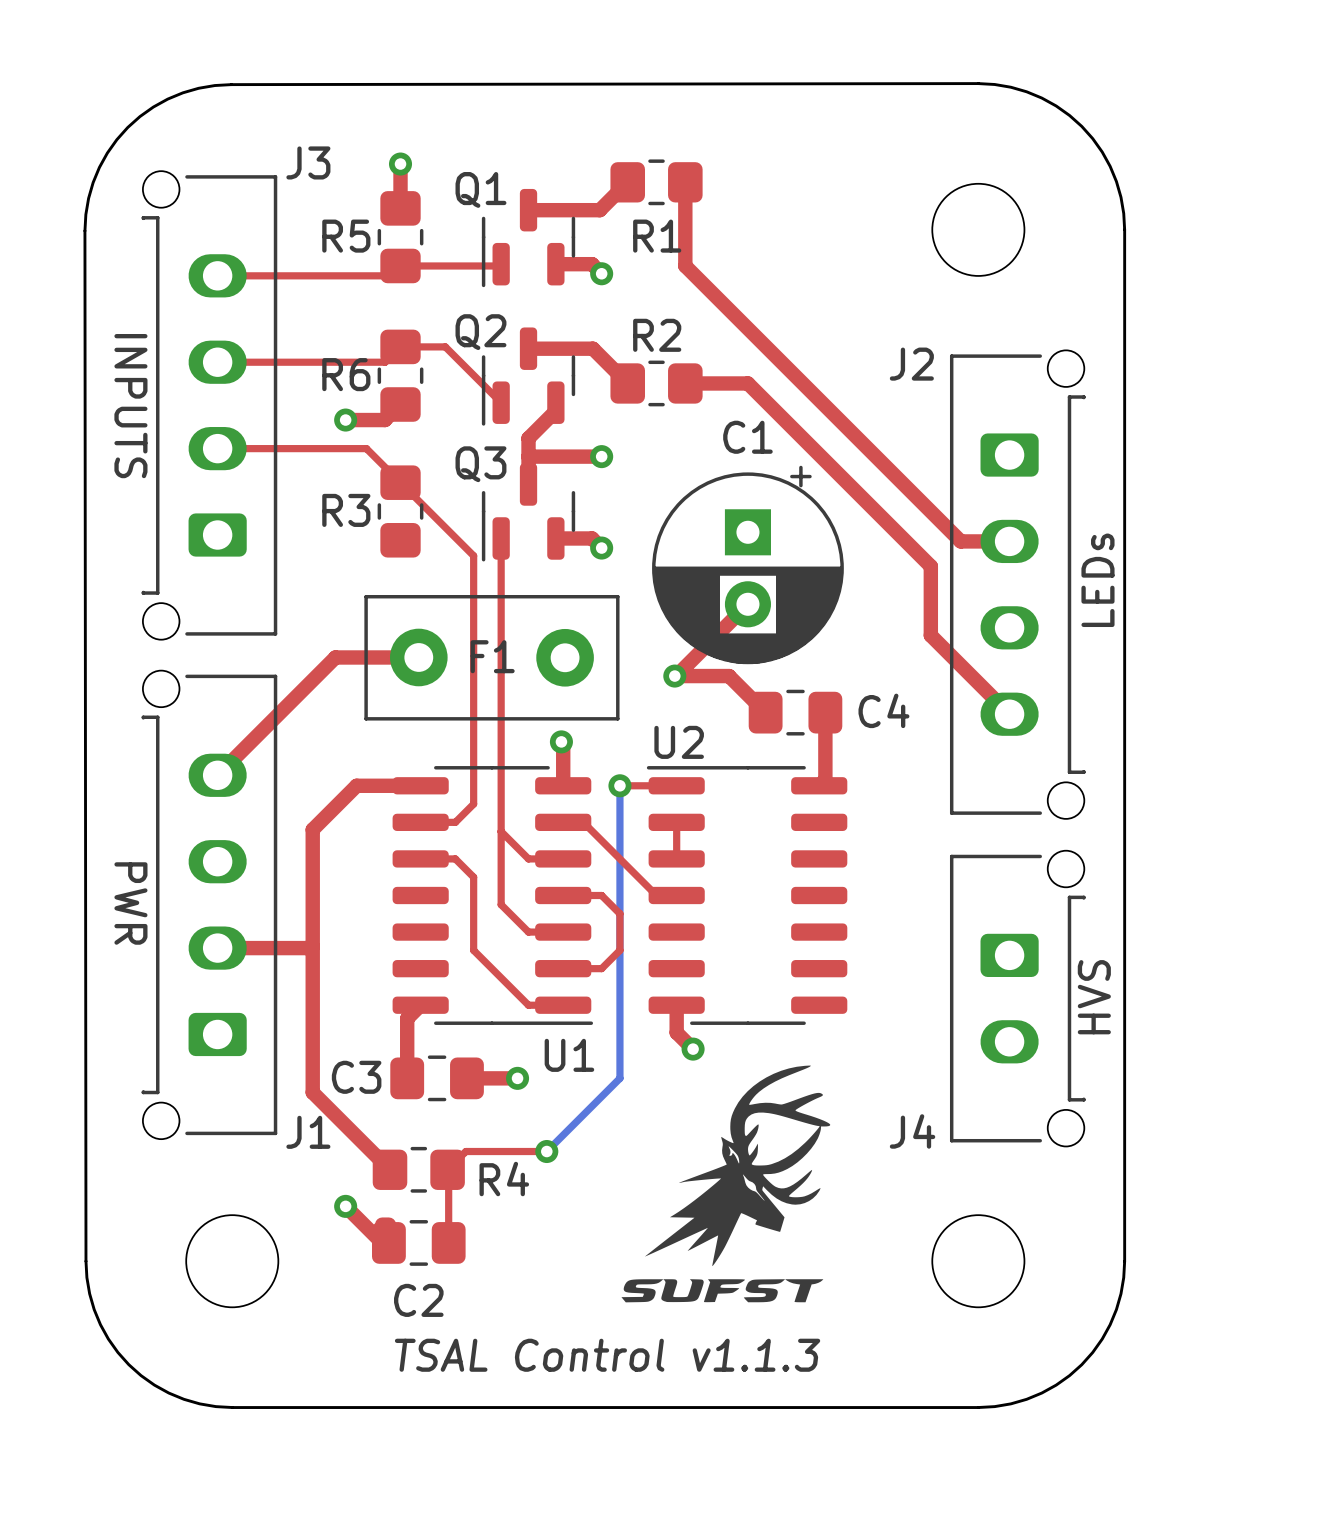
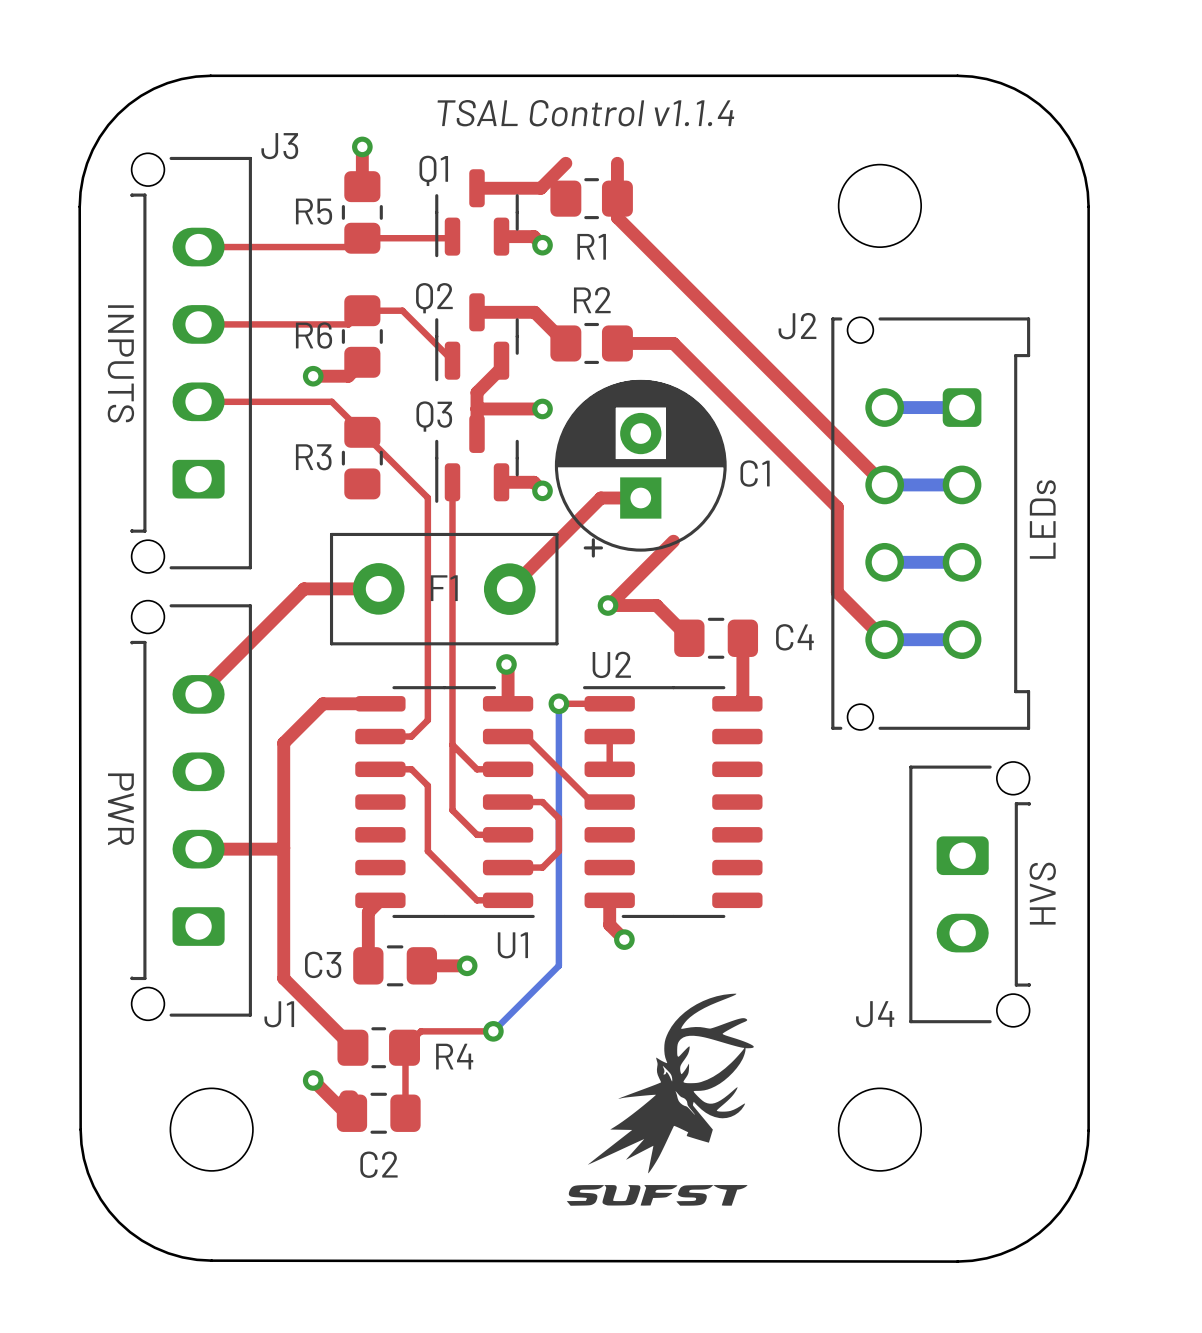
board edge: (231, 84) (994, 84) (1010, 87) (1041, 98) (1056, 105) (1081, 126) (1092, 138) (1110, 166) (1120, 197) (1124, 229) (1124, 1261) (1120, 1293) (1116, 1309) (1110, 1324) (1092, 1352) (1069, 1375) (1041, 1393) (1026, 1399) (994, 1406) (232, 1407) -> (210, 75) (972, 76) (986, 79) (1014, 88) (1039, 104) (1060, 125) (1068, 137) (1081, 163) (1087, 192) (1088, 206) (1088, 1130) (1087, 1145) (1081, 1173) (1075, 1187) (1060, 1212) (1039, 1232) (1014, 1248) (986, 1258) (972, 1260) (211, 1260)
text: none -> TSAL Control v1.1.4 (585, 113)
R1 position: (656, 182) -> (591, 198)
top track: (685, 243) (685, 265) (960, 541) (1009, 541) -> (617, 217) (884, 484)
J2 footprint: [949, 350, 1086, 819] -> [831, 317, 1031, 730]
C1 name position: C1 (747, 437) -> C1 (755, 473)
bottom track: none -> (884, 407) (962, 407)
bottom track: none -> (884, 484) (962, 484)
top track: none -> (640, 498) (600, 498) (509, 589)
C1 rotation: 0° (747, 564) -> 180° (640, 468)
text position: LEDs (1097, 580) -> LEDs (1042, 519)
bottom track: none -> (884, 562) (962, 562)
top track: (930, 635) (1009, 714) -> (837, 569) (837, 592) (884, 639)
bottom track: none -> (884, 639) (962, 639)
text position: HVS (1094, 997) -> HVS (1042, 893)
J4 position: (1017, 998) -> (970, 894)
drawing position: (737, 1165) -> (670, 1083)
drawing position: (722, 1290) -> (657, 1195)
text: TSAL Control v1.1.3 (607, 1355) -> none

